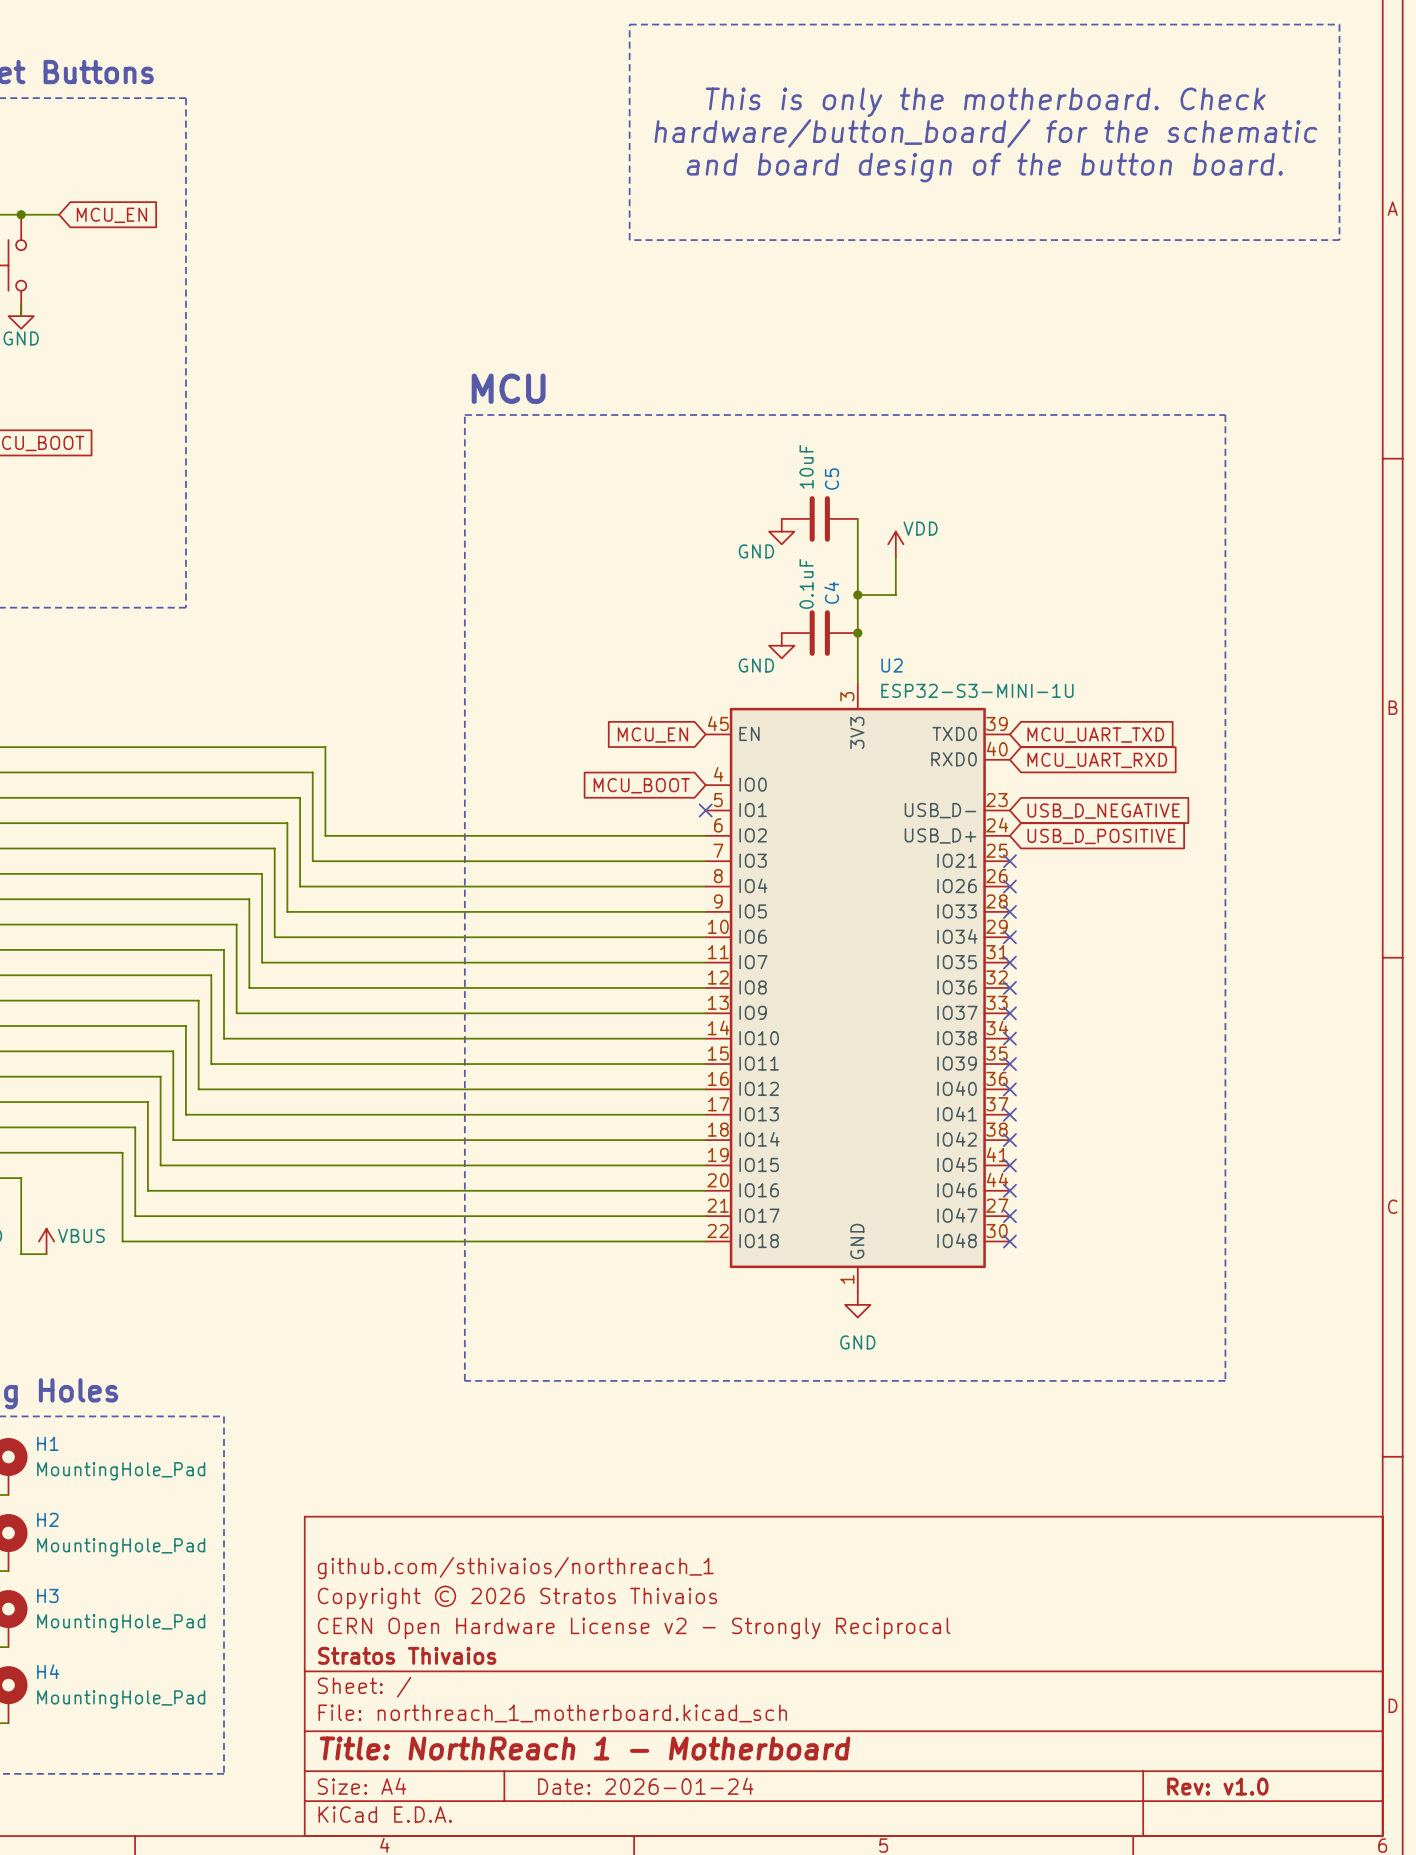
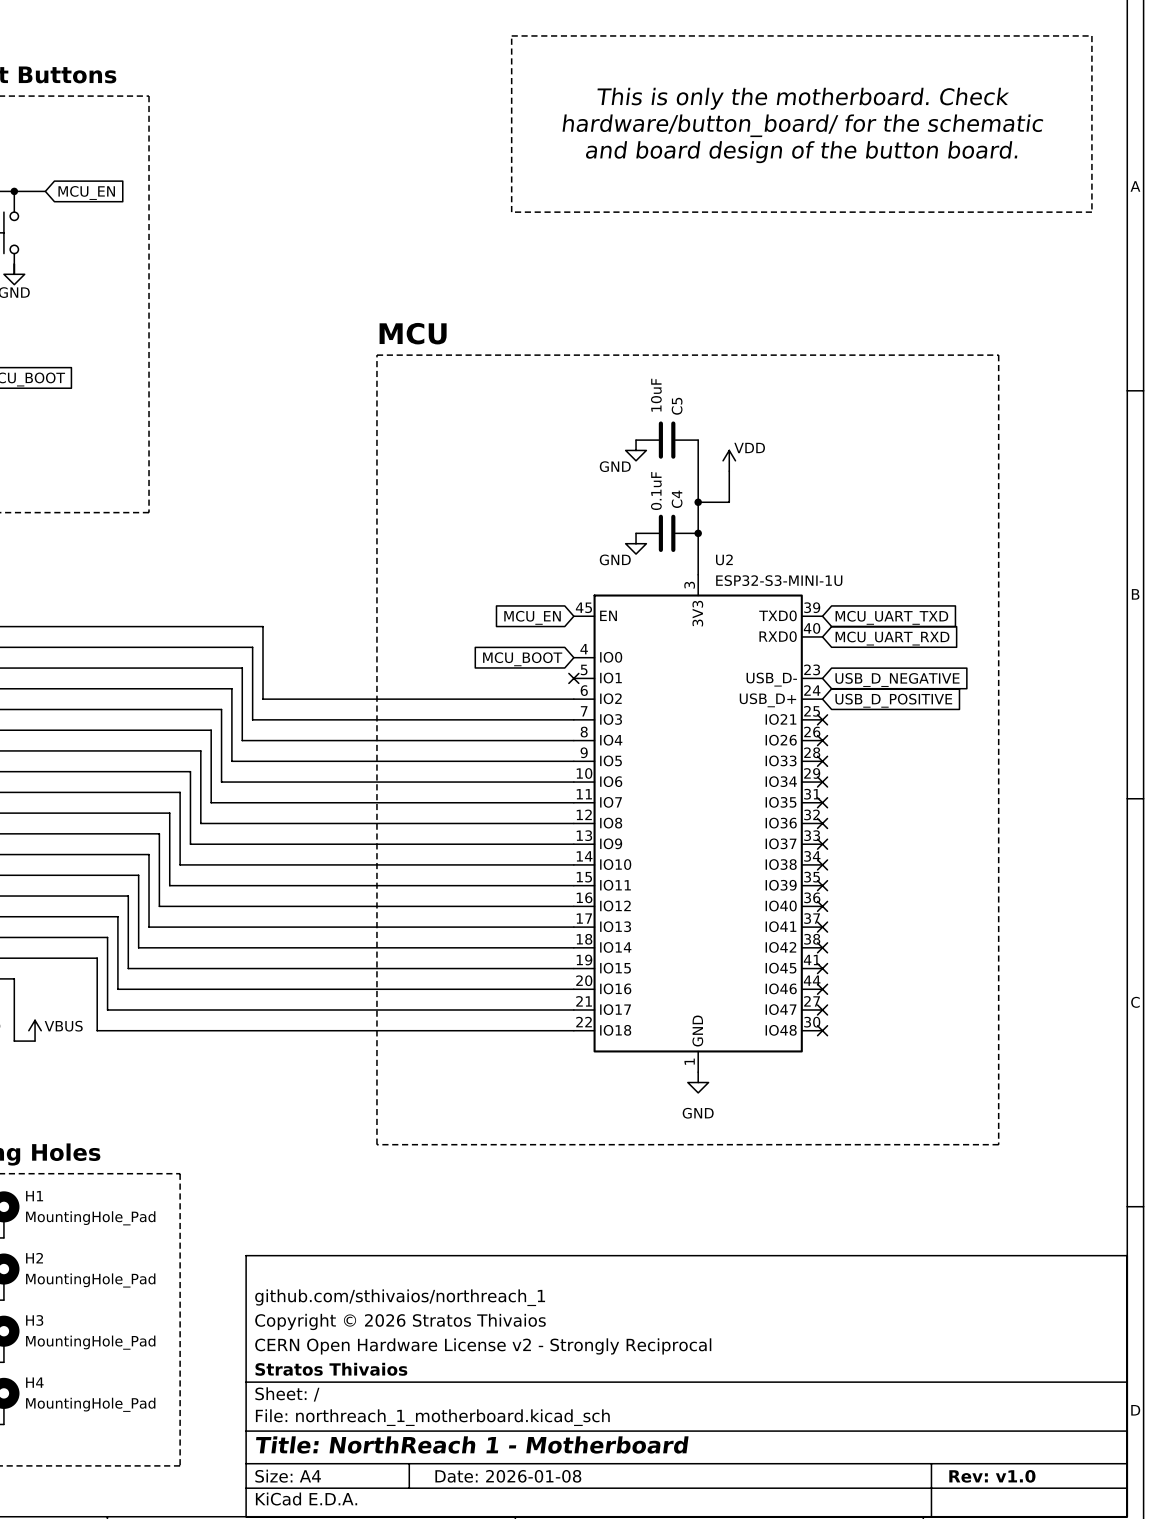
title block: Date: 2026-01-24 (645, 1786) -> Date: 2026-01-08 (508, 1476)

